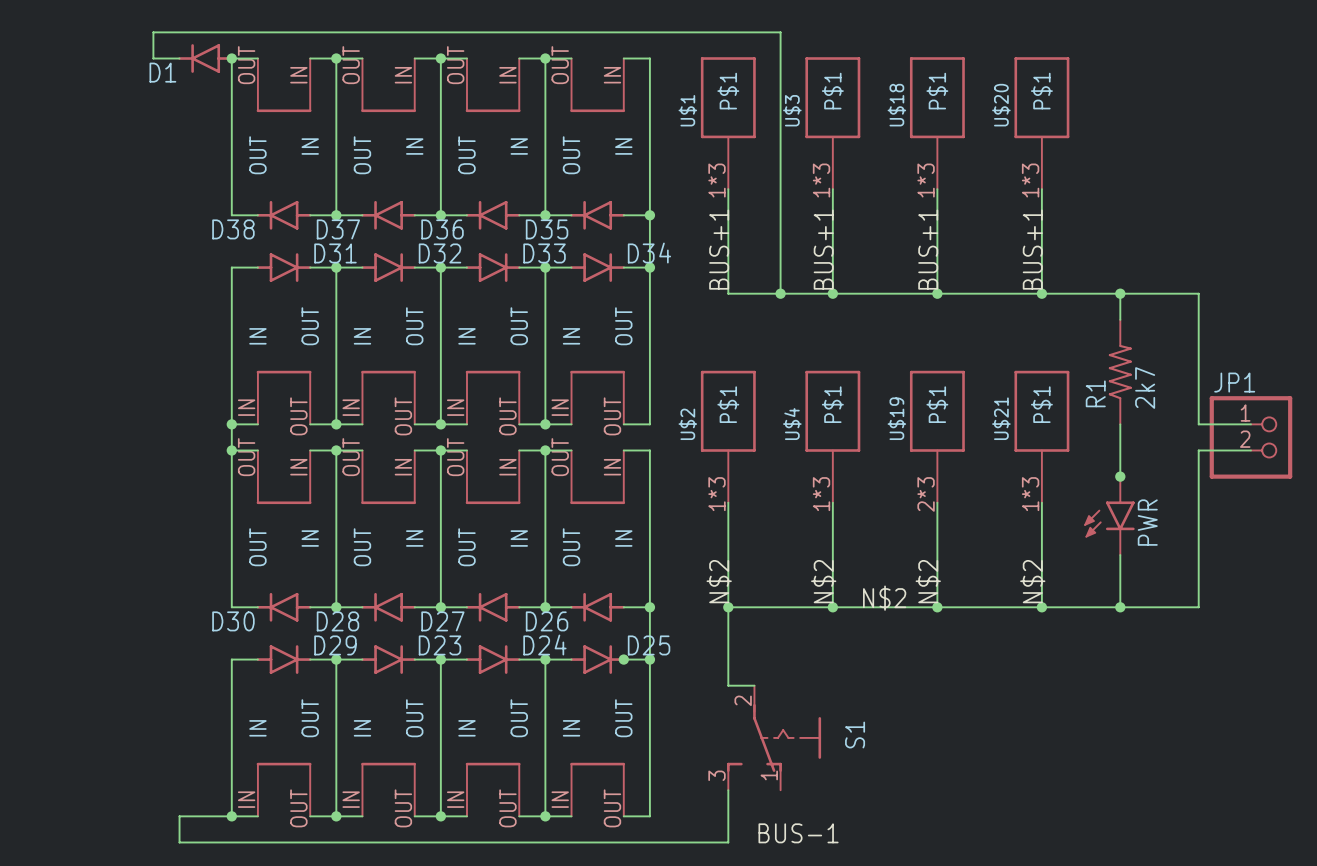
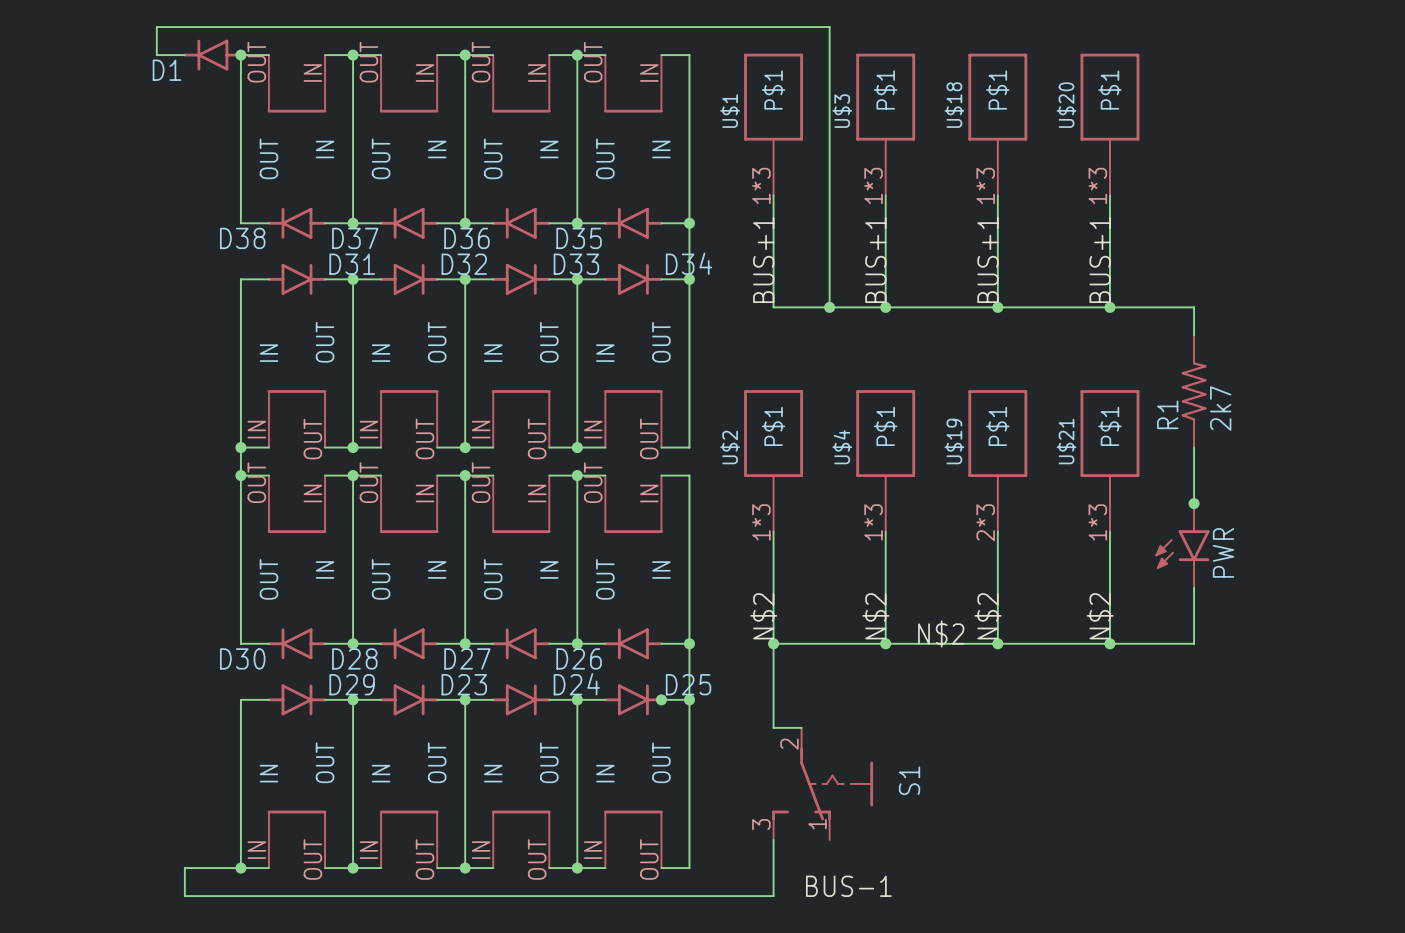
wire: (1120, 293) (1198, 293) (1198, 424) (1250, 424) -> none
junction: (1120, 293) -> none
JP1: (1250, 437) -> none
wire: (1250, 450) (1198, 450) (1198, 607) (1120, 607) -> none
junction: (1120, 607) -> none

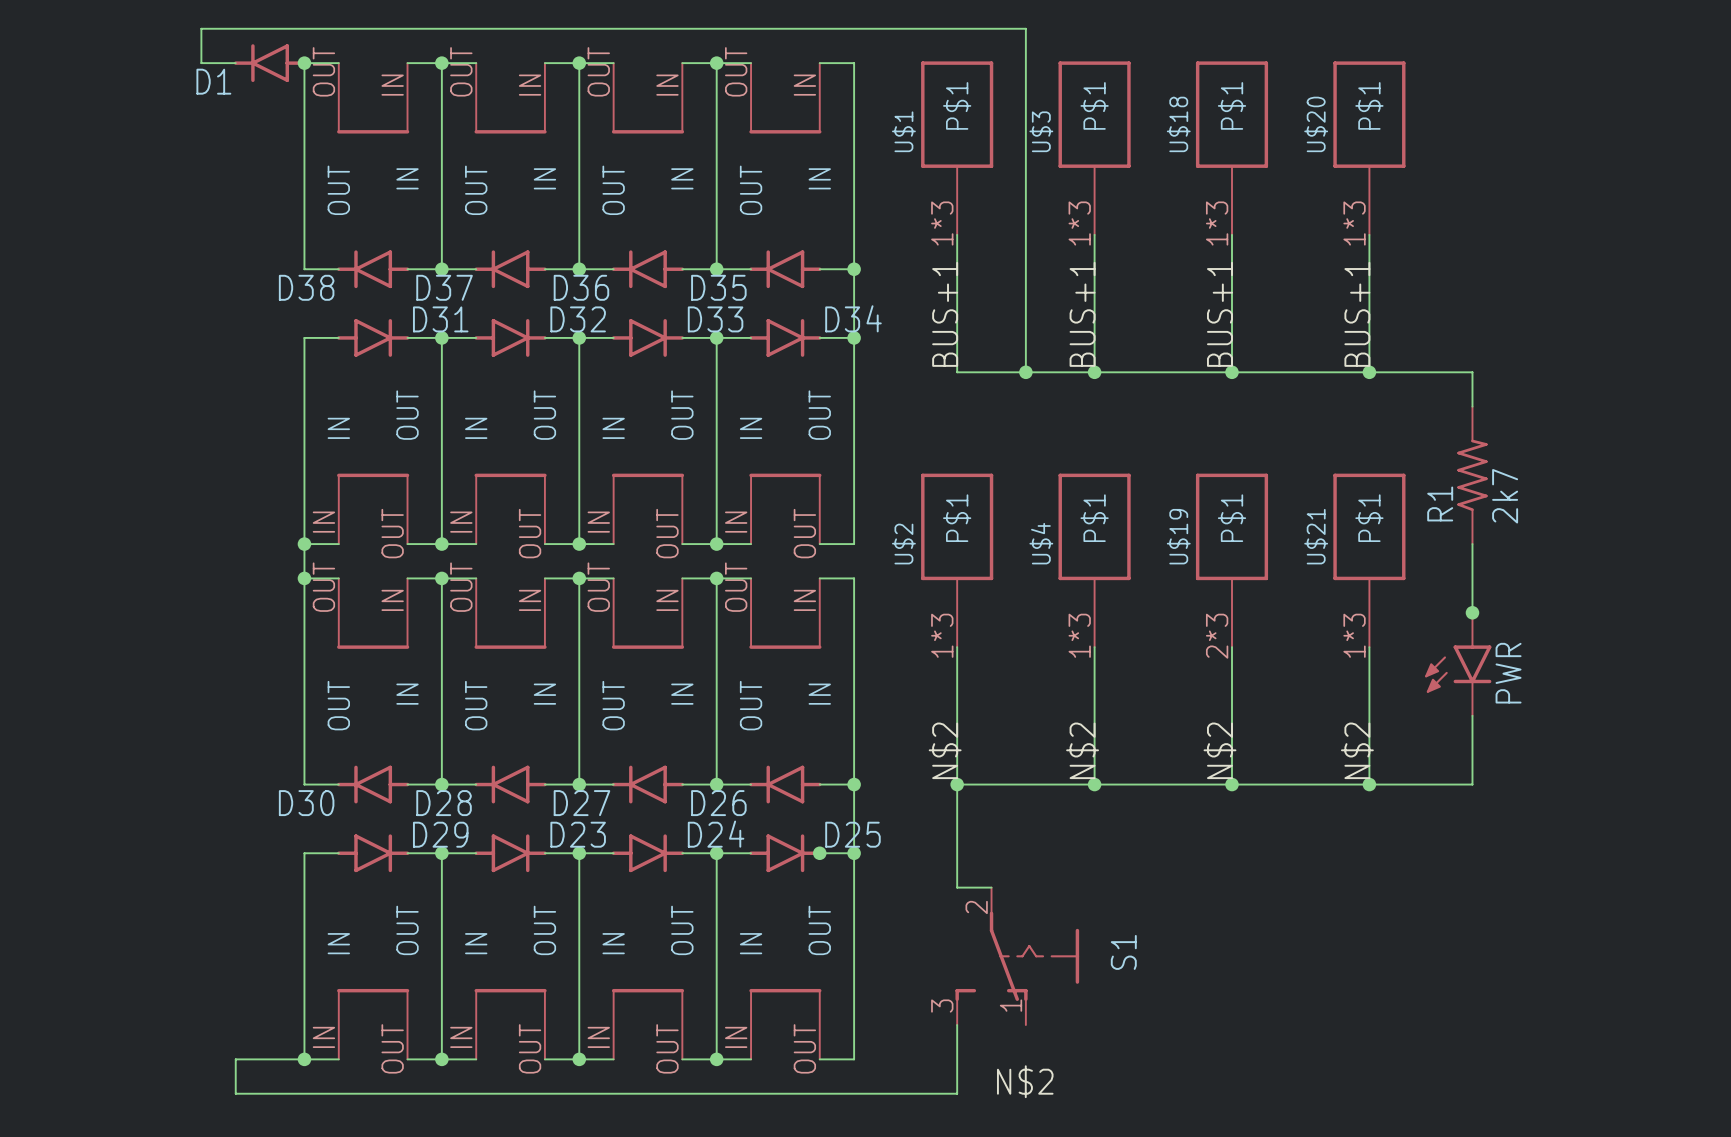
label: N$2 (941, 633) -> none
label: BUS-1 (848, 886) -> N$2 (1025, 1081)

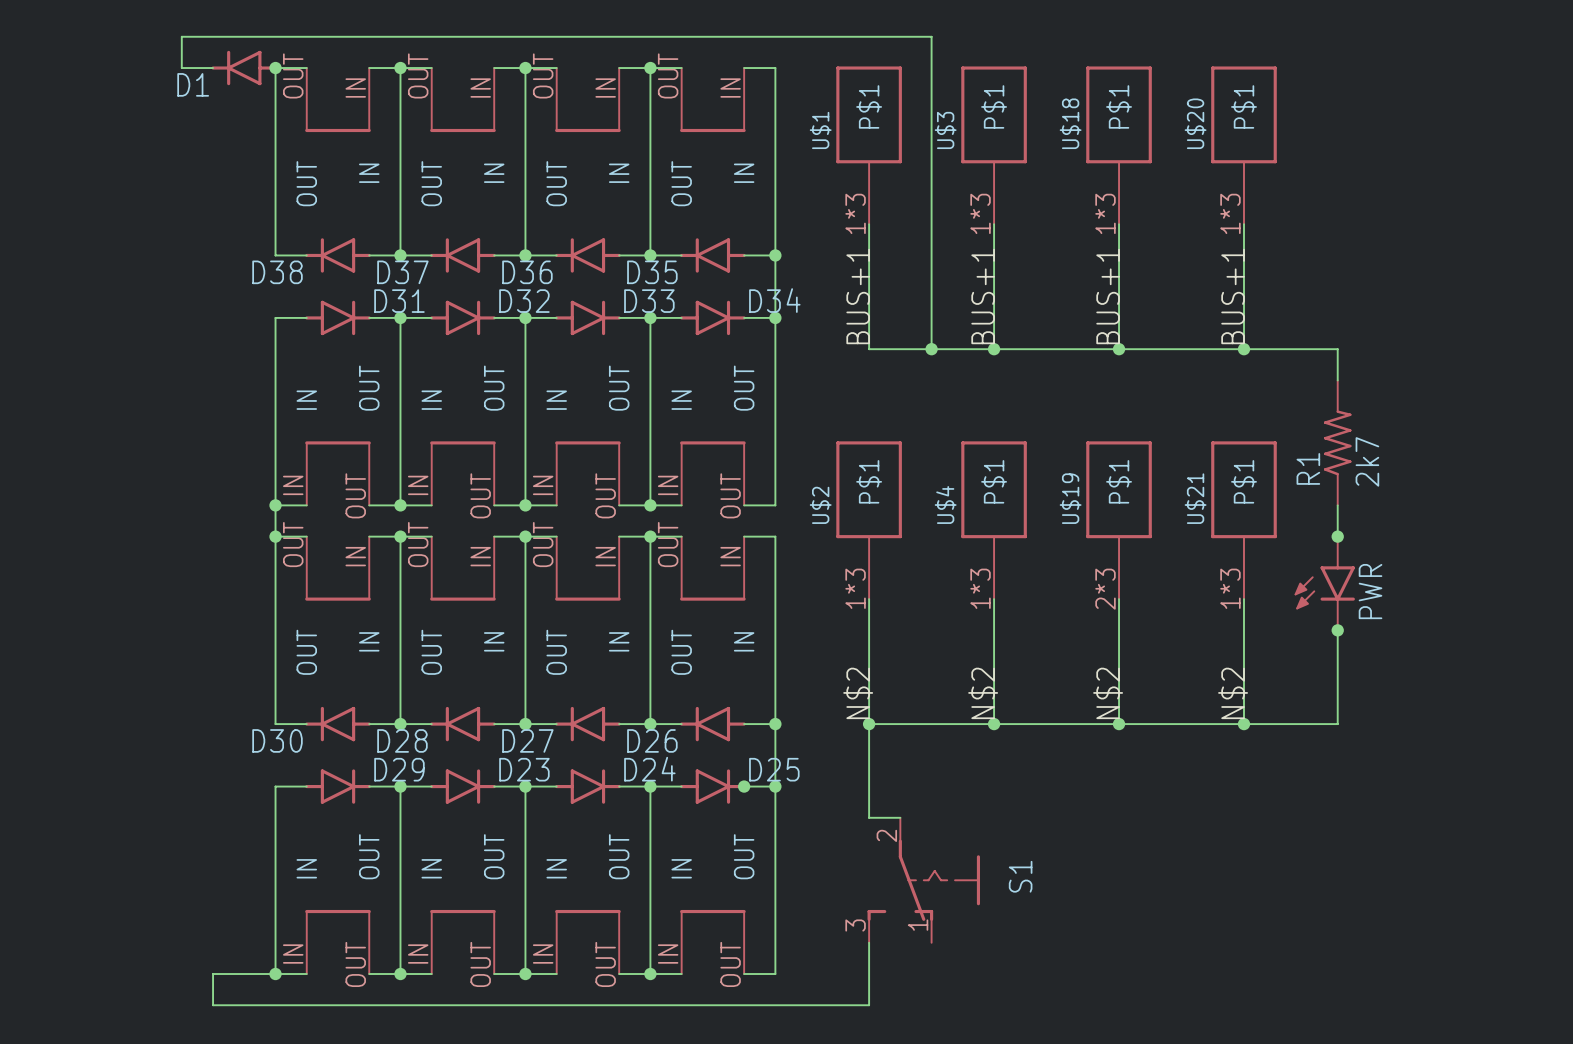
junction: none -> (1337, 536)
junction: (1472, 612) -> none
PWR position: (1458, 664) -> (1324, 583)
junction: none -> (1337, 630)
label: N$2 (1025, 1081) -> none

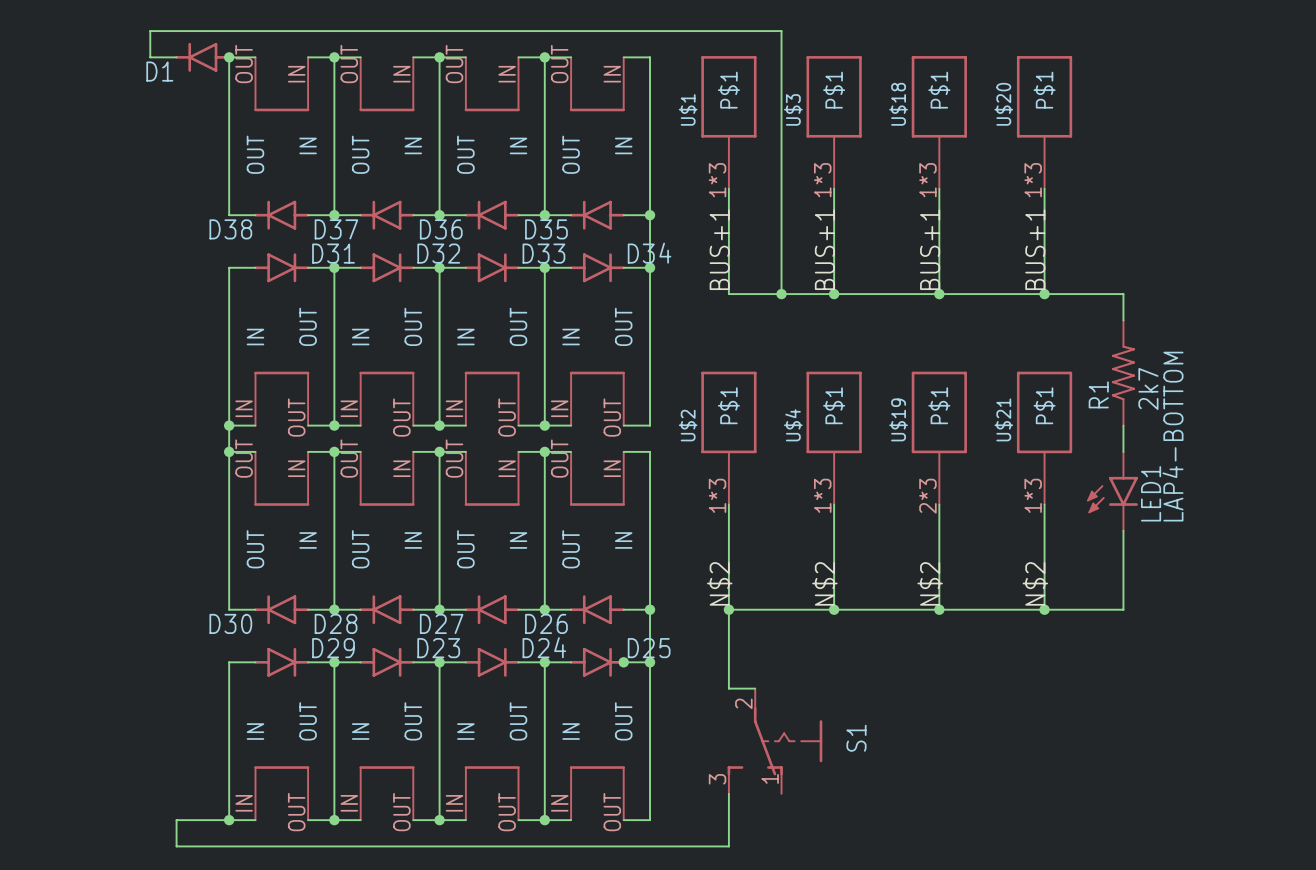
PWR value: none -> LAP4-BOTTOM (1172, 436)
junction: (1337, 536) -> none
PWR name: PWR (1370, 591) -> LED1 (1151, 493)
junction: (1337, 630) -> none

